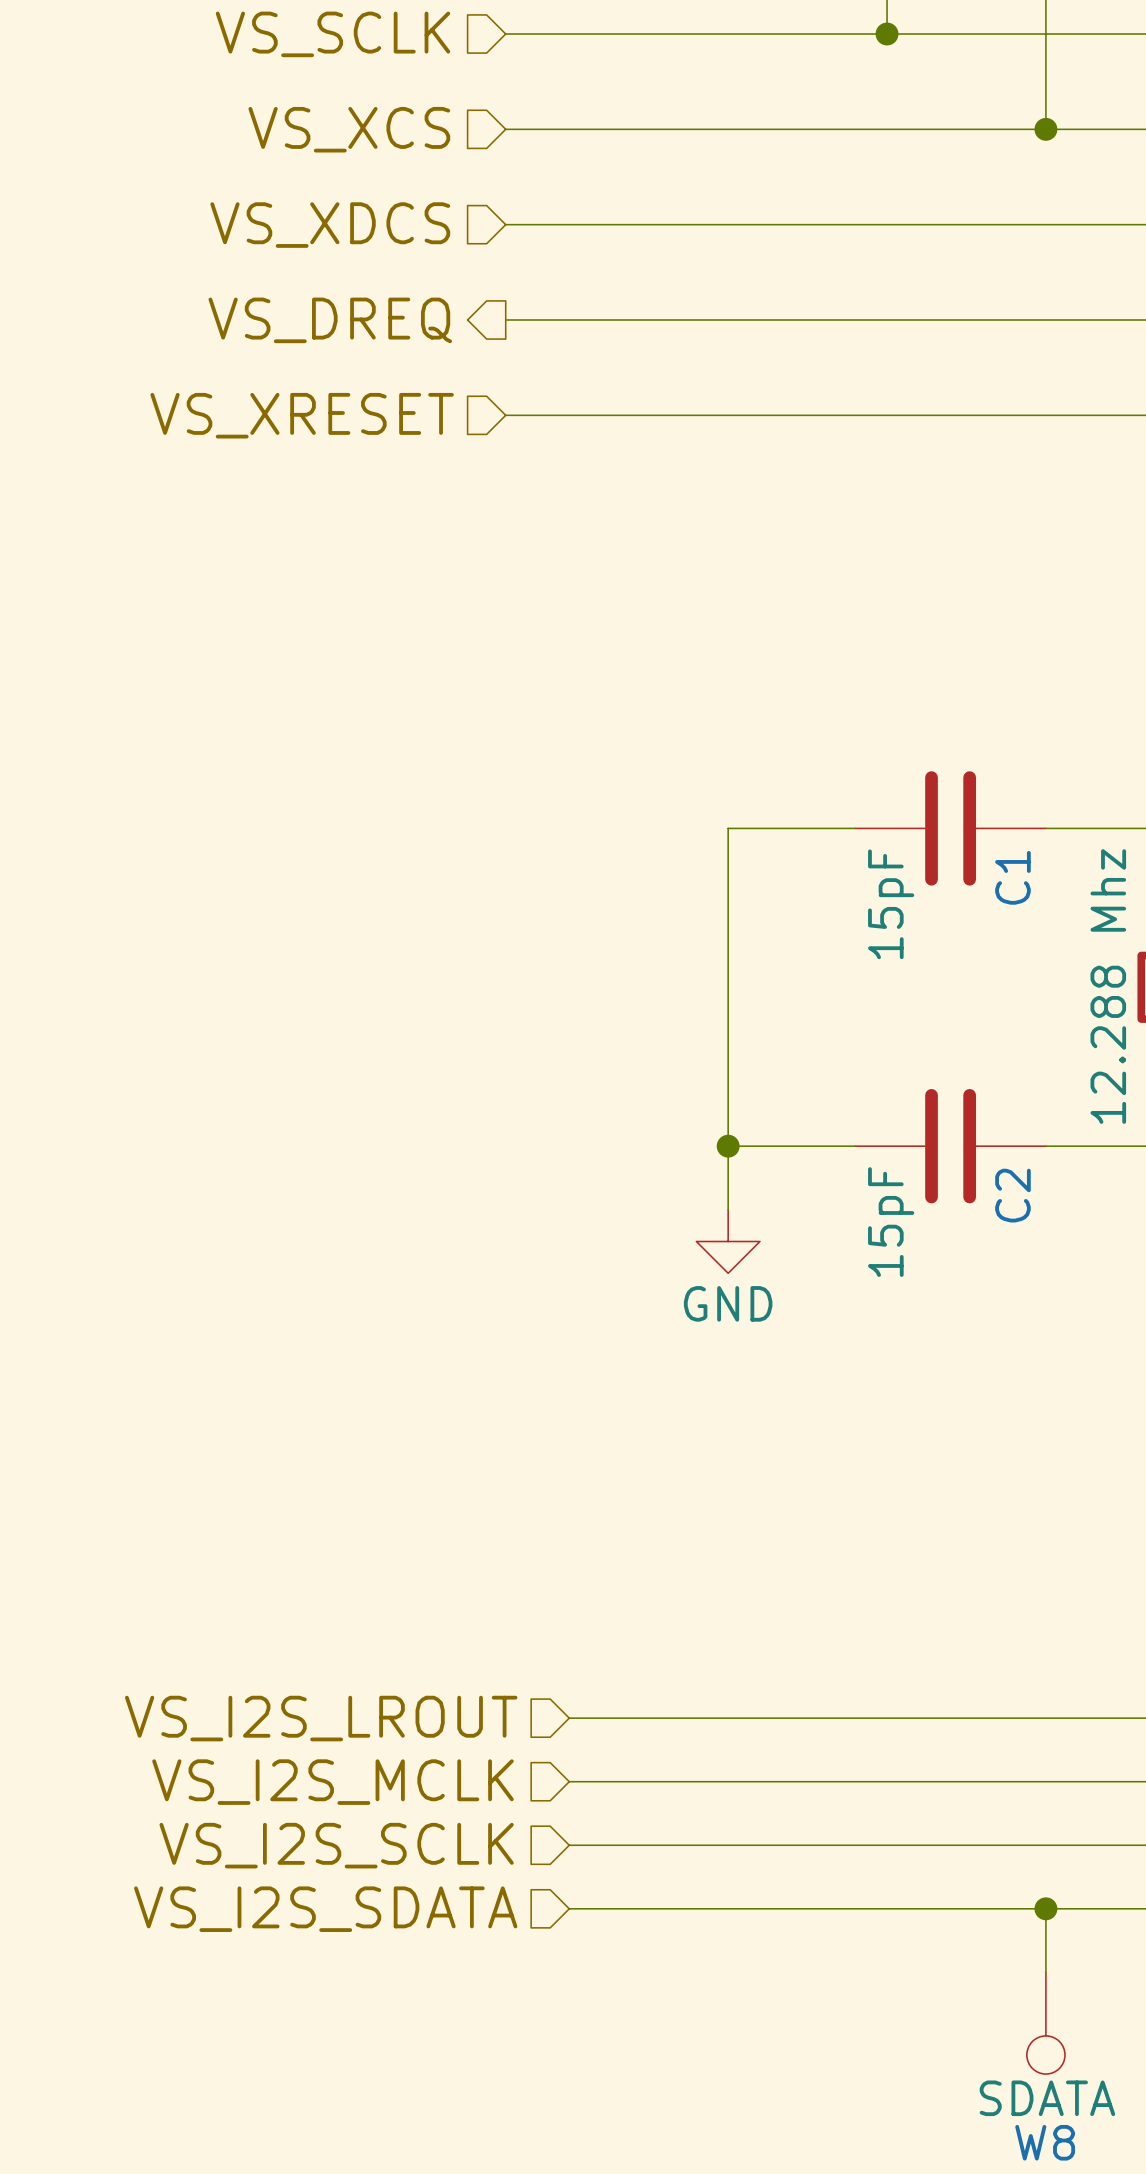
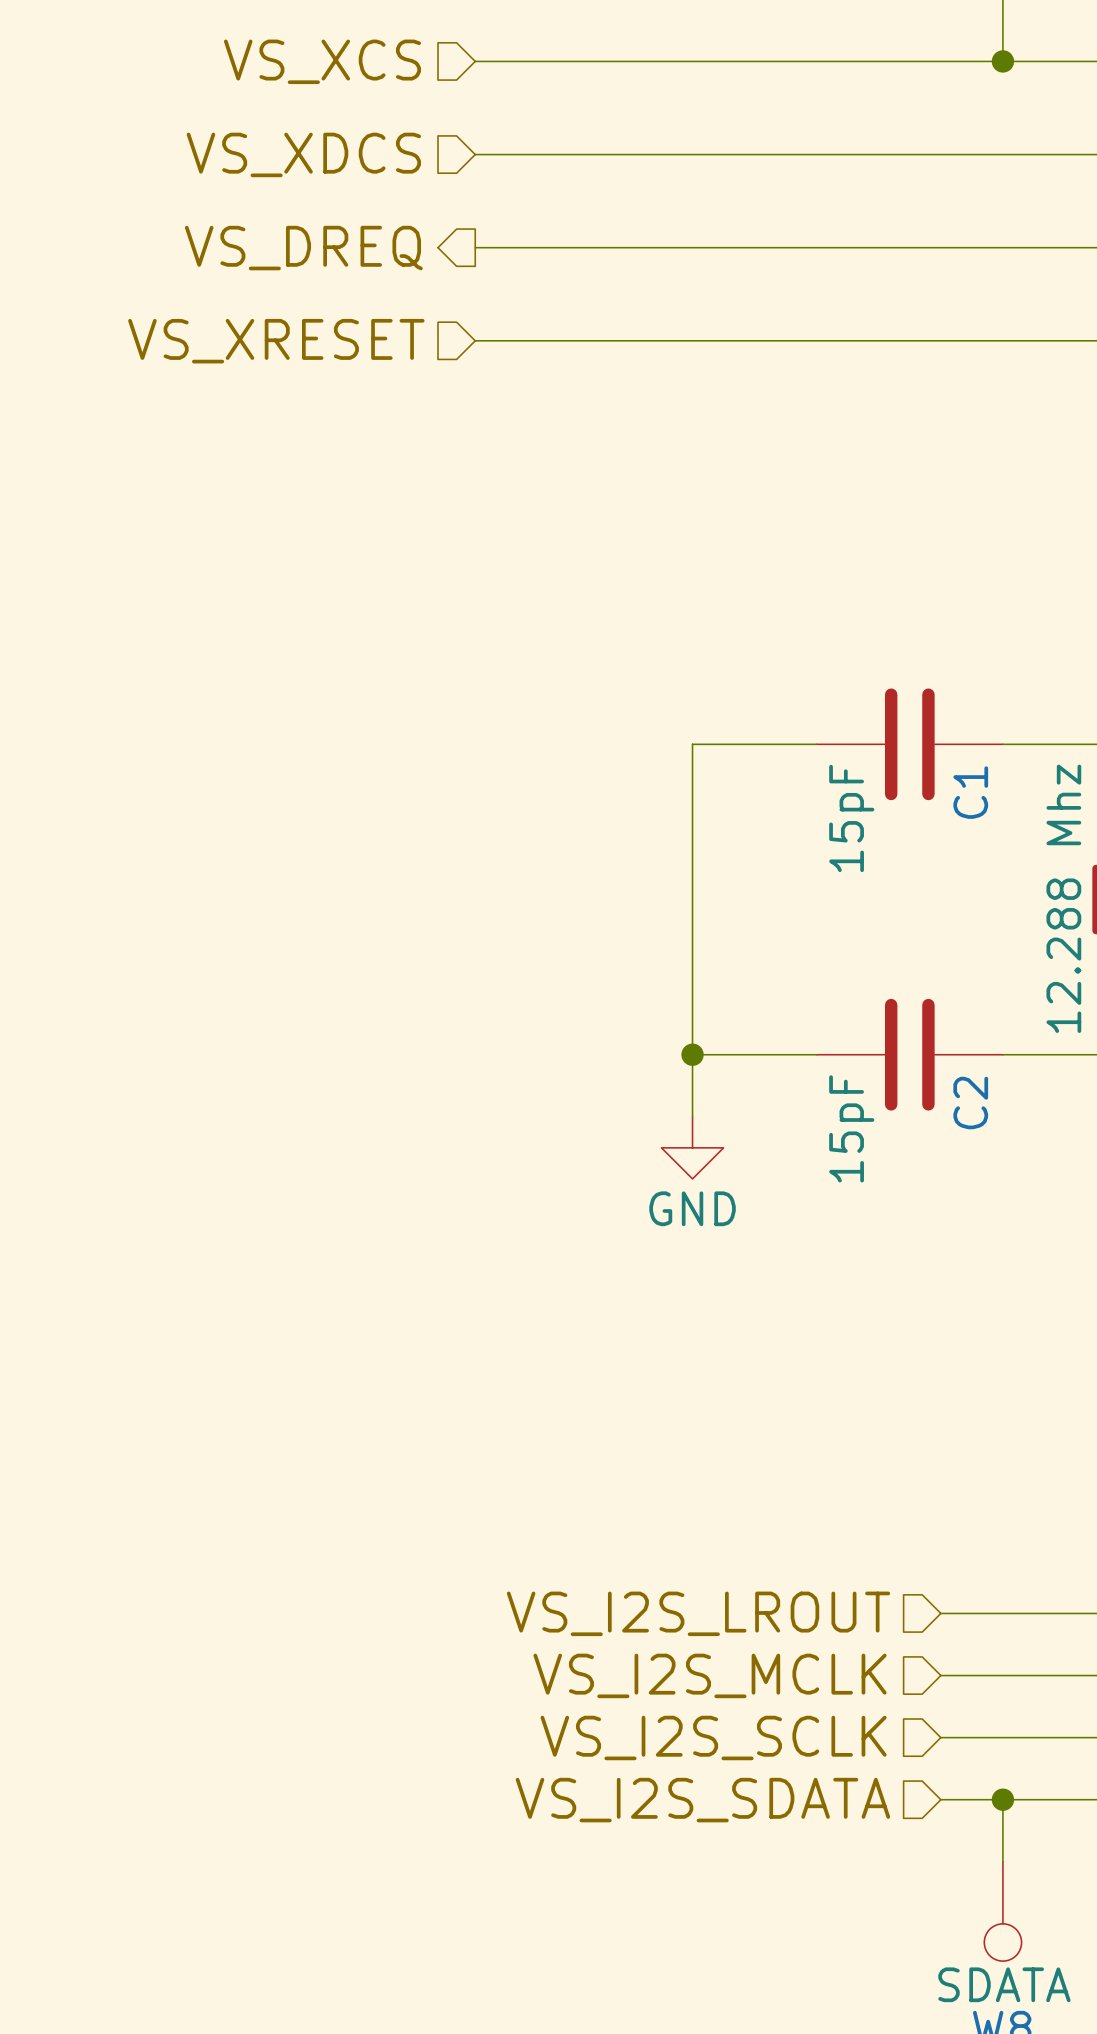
hierarchical label position: VS_I2S_LROUT (321, 1718) -> VS_I2S_LROUT (698, 1613)
wire: (569, 1718) (982, 1718) -> none
wire: (569, 1781) (982, 1781) -> none
hierarchical label position: VS_I2S_MCLK (332, 1782) -> VS_I2S_MCLK (710, 1675)
hierarchical label position: VS_I2S_SCLK (336, 1845) -> VS_I2S_SCLK (713, 1738)
wire: (569, 1845) (982, 1845) -> none
wire: (569, 1908) (982, 1908) -> none
hierarchical label position: VS_I2S_SDATA (325, 1909) -> VS_I2S_SDATA (702, 1800)

